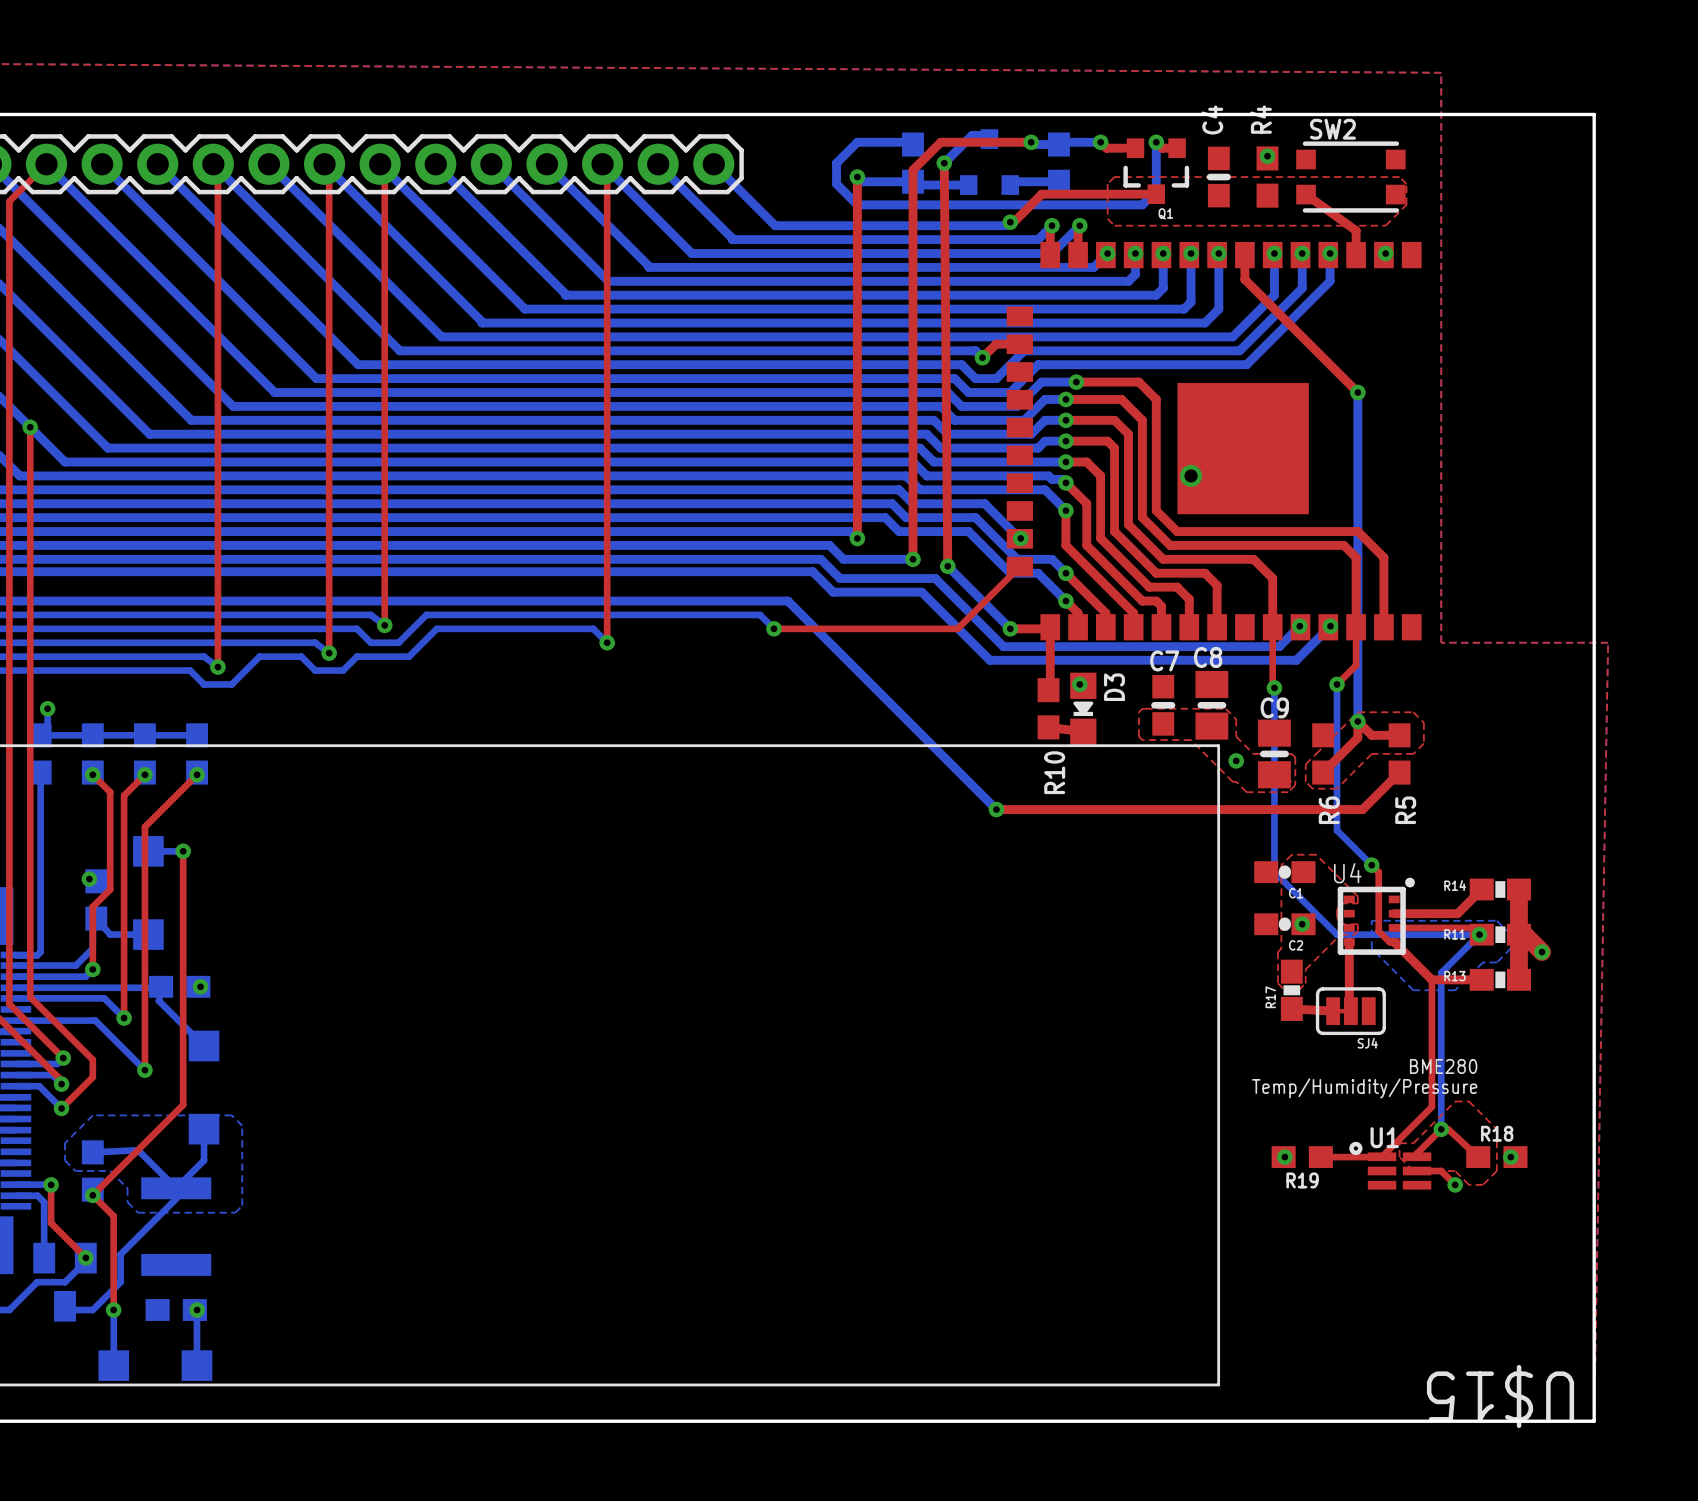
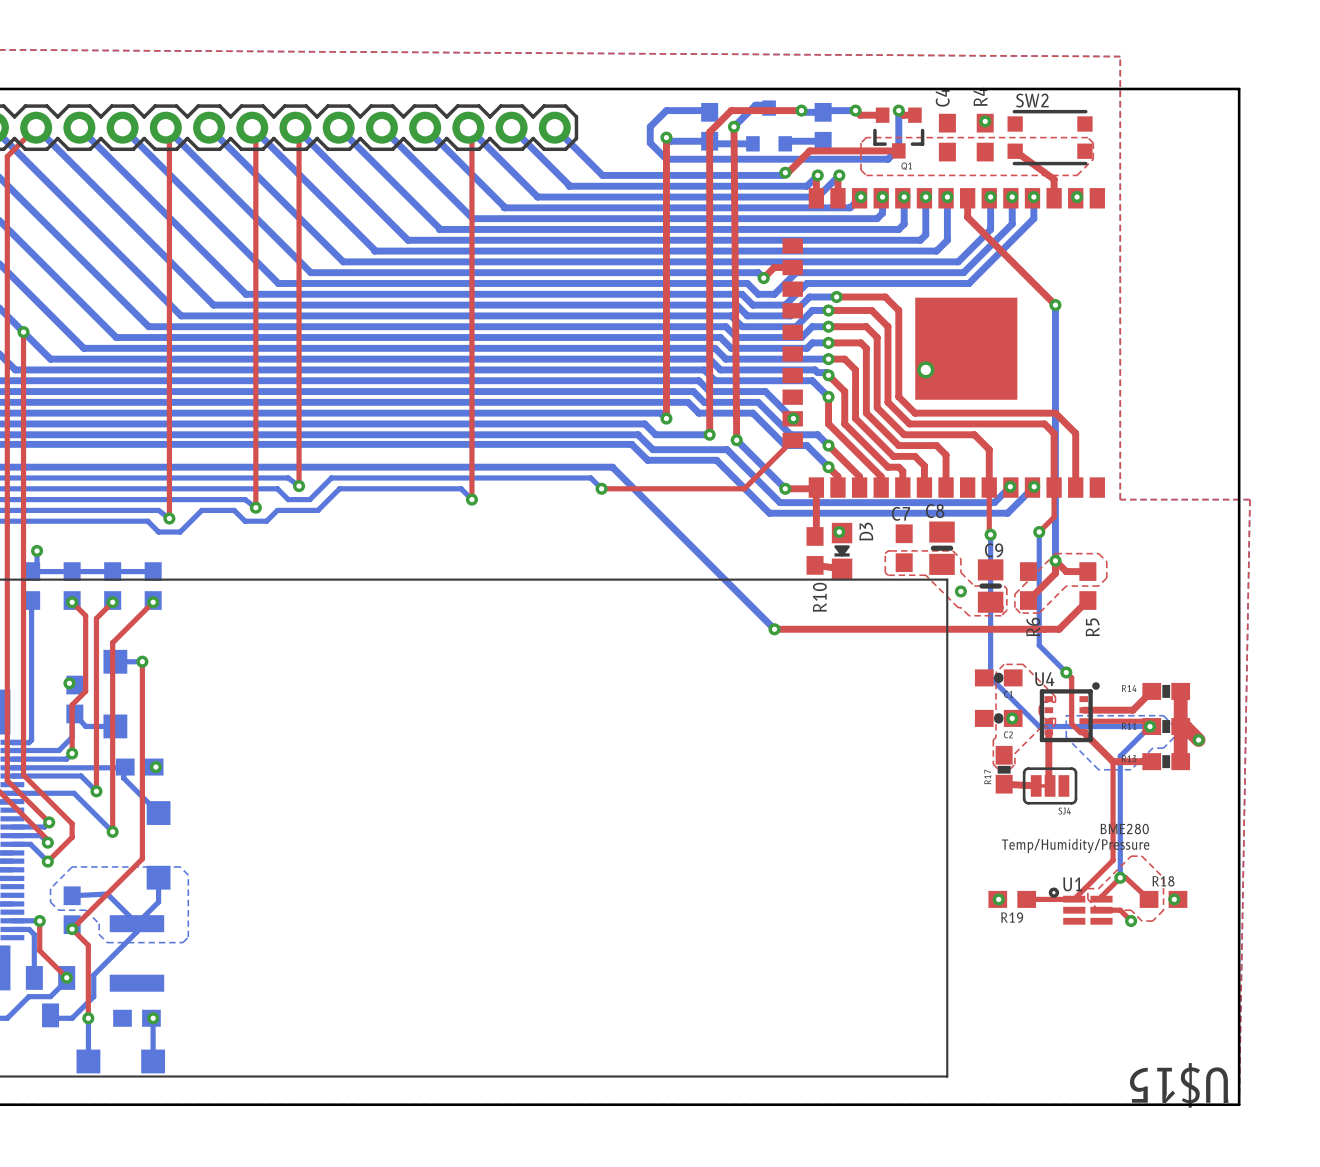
C4 footprint: [1206, 146, 1231, 208] -> [938, 113, 956, 162]
C7 footprint: [1151, 674, 1176, 736] -> [895, 524, 913, 573]

